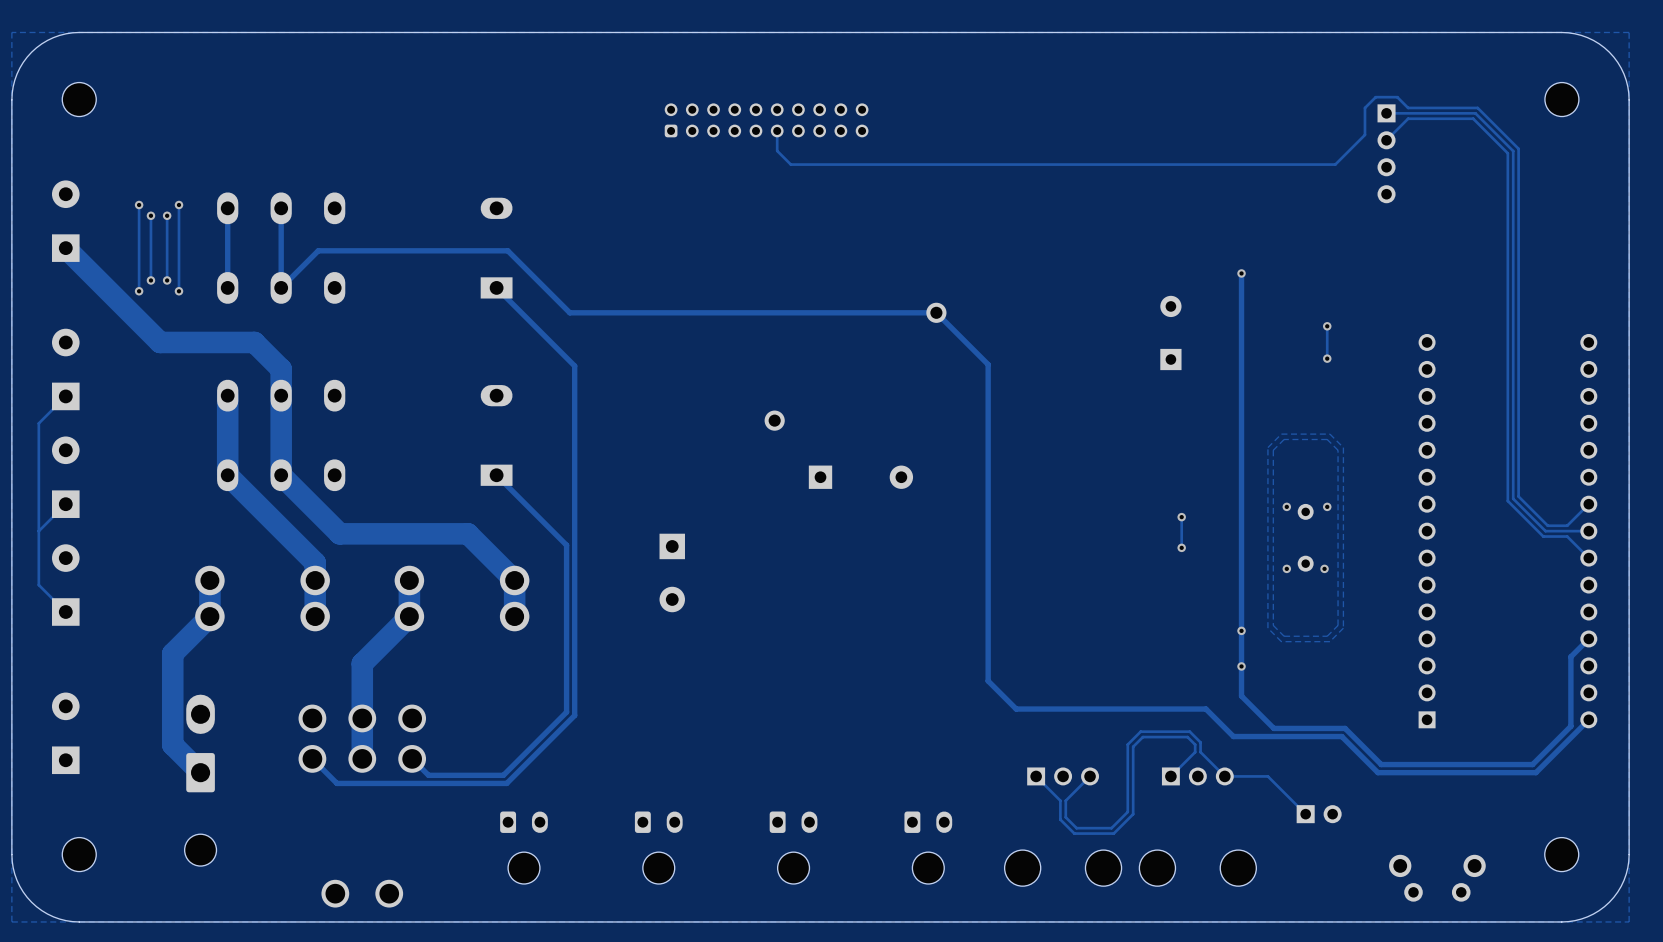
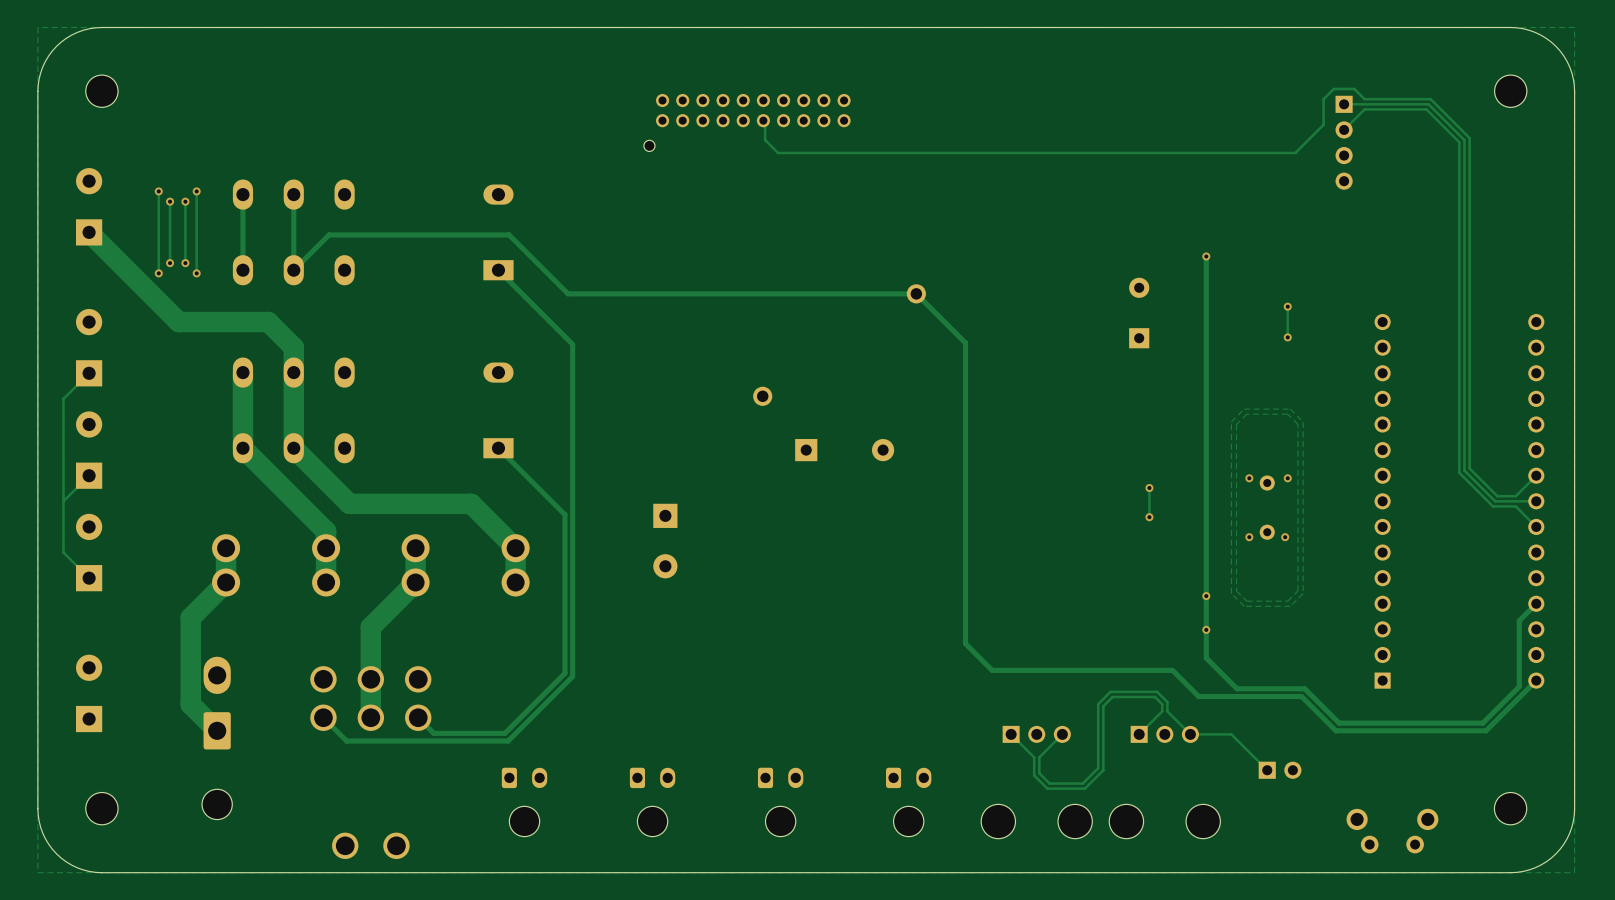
part: (766, 120) -> none
part: none -> (747, 122)

